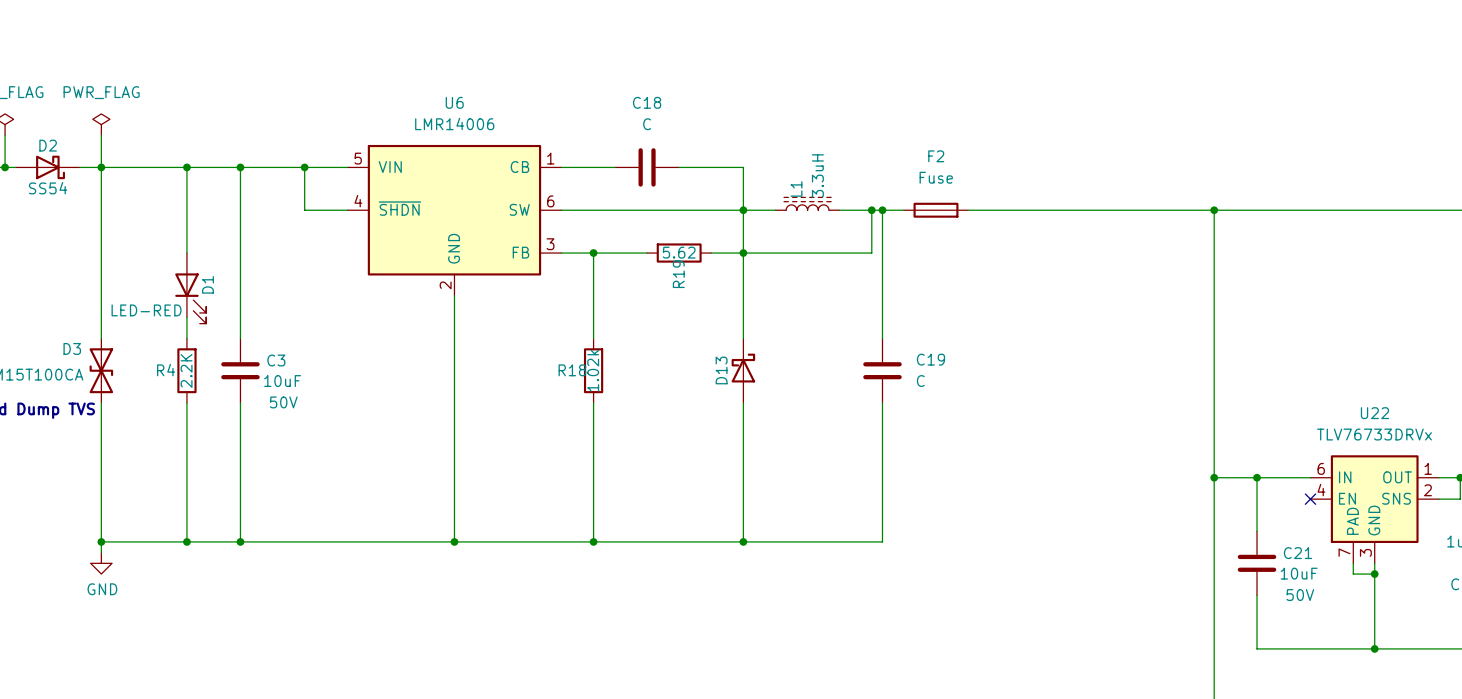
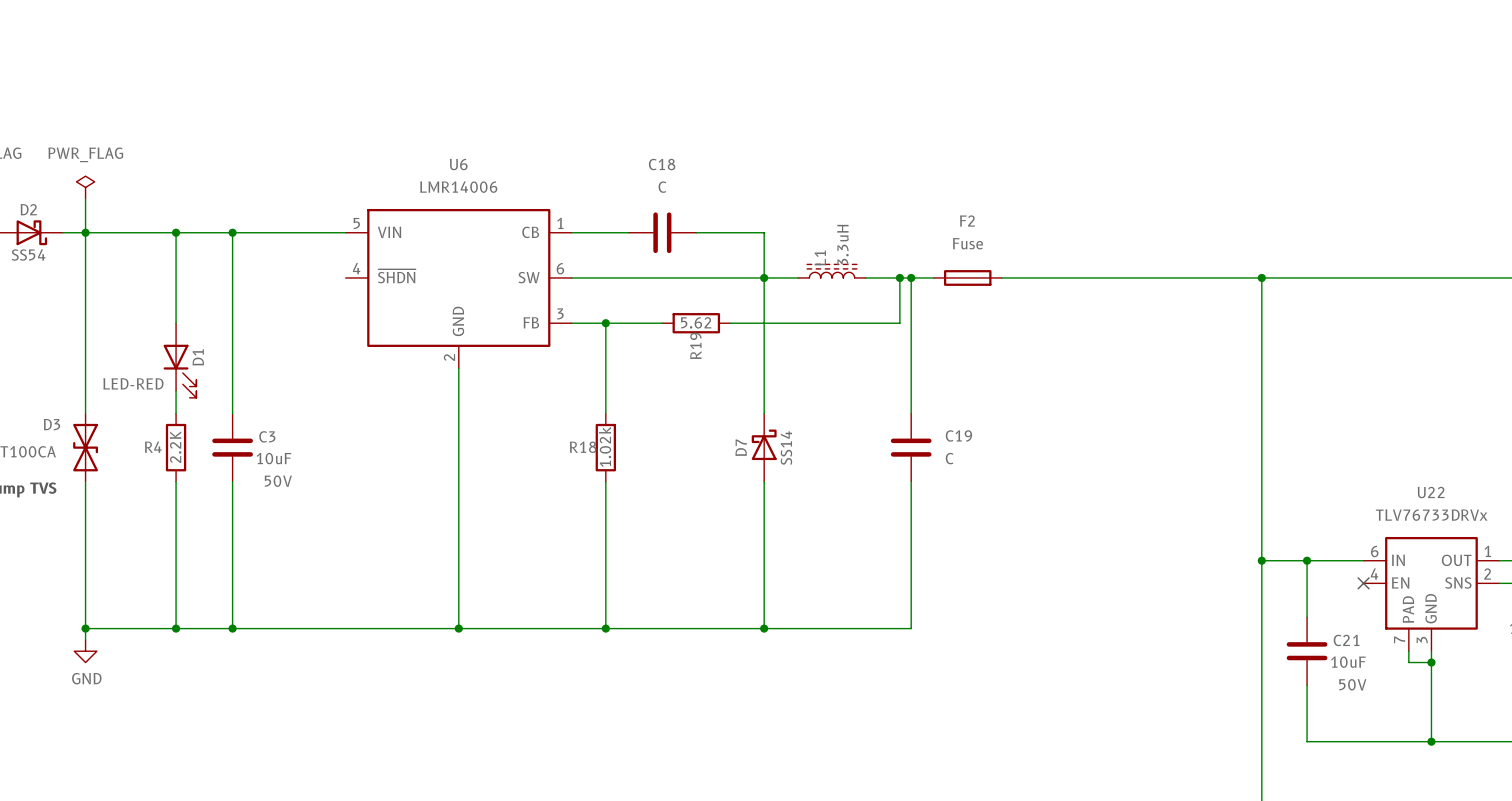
wire: (304, 167) (304, 210) (347, 210) -> none
junction: (304, 167) -> none
junction: (743, 253) -> none
D13 name: D13 (721, 370) -> D7 (741, 447)
D13 value: none -> SS14 (786, 448)

